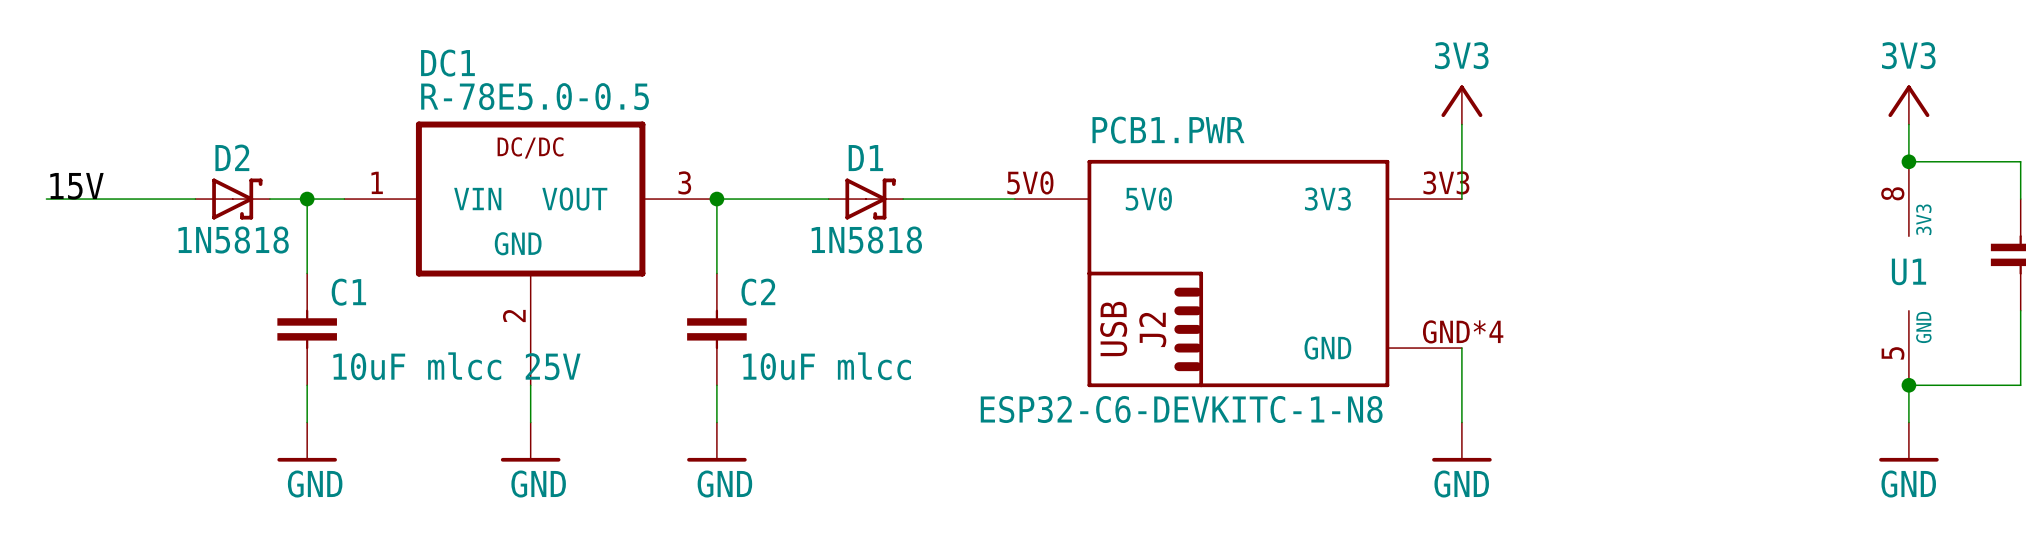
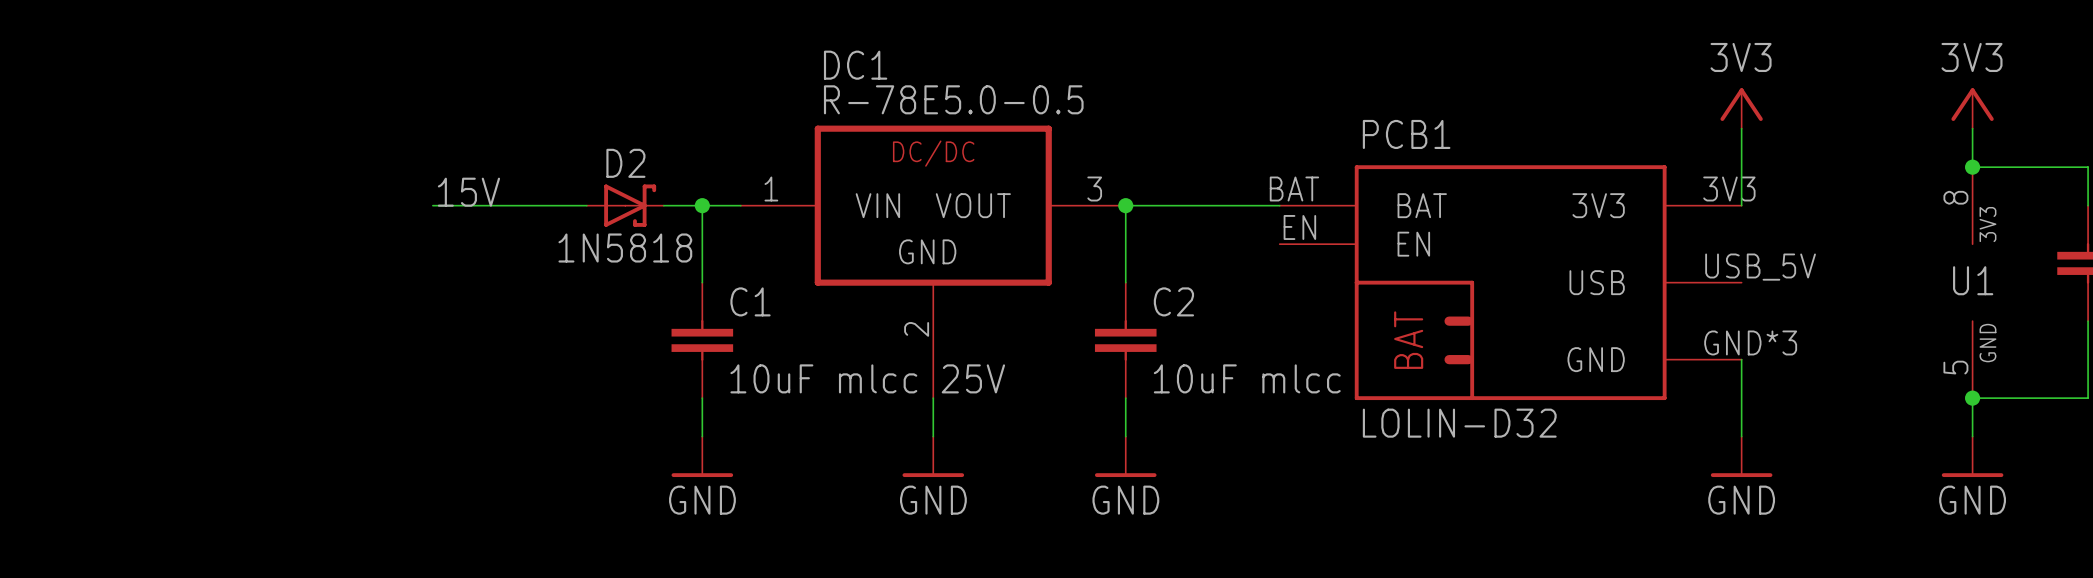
power symbol position: 3V3 (1461, 104) -> 3V3 (1741, 108)
wire: (1461, 124) (1461, 199) -> (1741, 128) (1741, 205)
label: 15V (76, 186) -> none
label: none -> 15V (468, 192)
wire: (46, 199) (195, 199) -> none
D2 position: (232, 199) -> (625, 205)
wire: (269, 199) (344, 199) -> none
wire: (307, 199) (307, 273) -> none
junction: (307, 199) -> none
wire: none -> (432, 205) (586, 205)
wire: none -> (702, 205) (702, 282)
junction position: (716, 199) -> (702, 205)
wire: (828, 199) (716, 199) (716, 273) -> none
D1: 1N5818 (865, 199) -> none
wire: (903, 199) (1014, 199) -> none
junction: none -> (1125, 205)
wire: none -> (1279, 205) (1125, 205) (1125, 282)
DC1 position: (530, 253) -> (933, 261)
PCB1.PWR: ESP32-C6-DEVKITC-1-N8 (1238, 273) -> none
PCB1: none -> LOLIN-D32 (1510, 282)
C1 position: (307, 329) -> (702, 340)
C2 position: (716, 329) -> (1125, 340)
wire: (1461, 348) (1461, 422) -> (1741, 359) (1741, 436)
wire: (307, 385) (307, 422) -> none
wire: (530, 385) (530, 422) -> none
wire: (716, 385) (716, 422) -> (702, 398) (702, 436)
wire: none -> (933, 398) (933, 436)
wire: none -> (1125, 398) (1125, 436)
power symbol: GND (307, 442) -> none
power symbol: GND (530, 442) -> none
power symbol position: GND (716, 442) -> GND (702, 456)
power symbol: none -> GND (933, 456)
power symbol: none -> GND (1125, 456)
power symbol: GND (1461, 442) -> none
power symbol: none -> GND (1741, 456)

